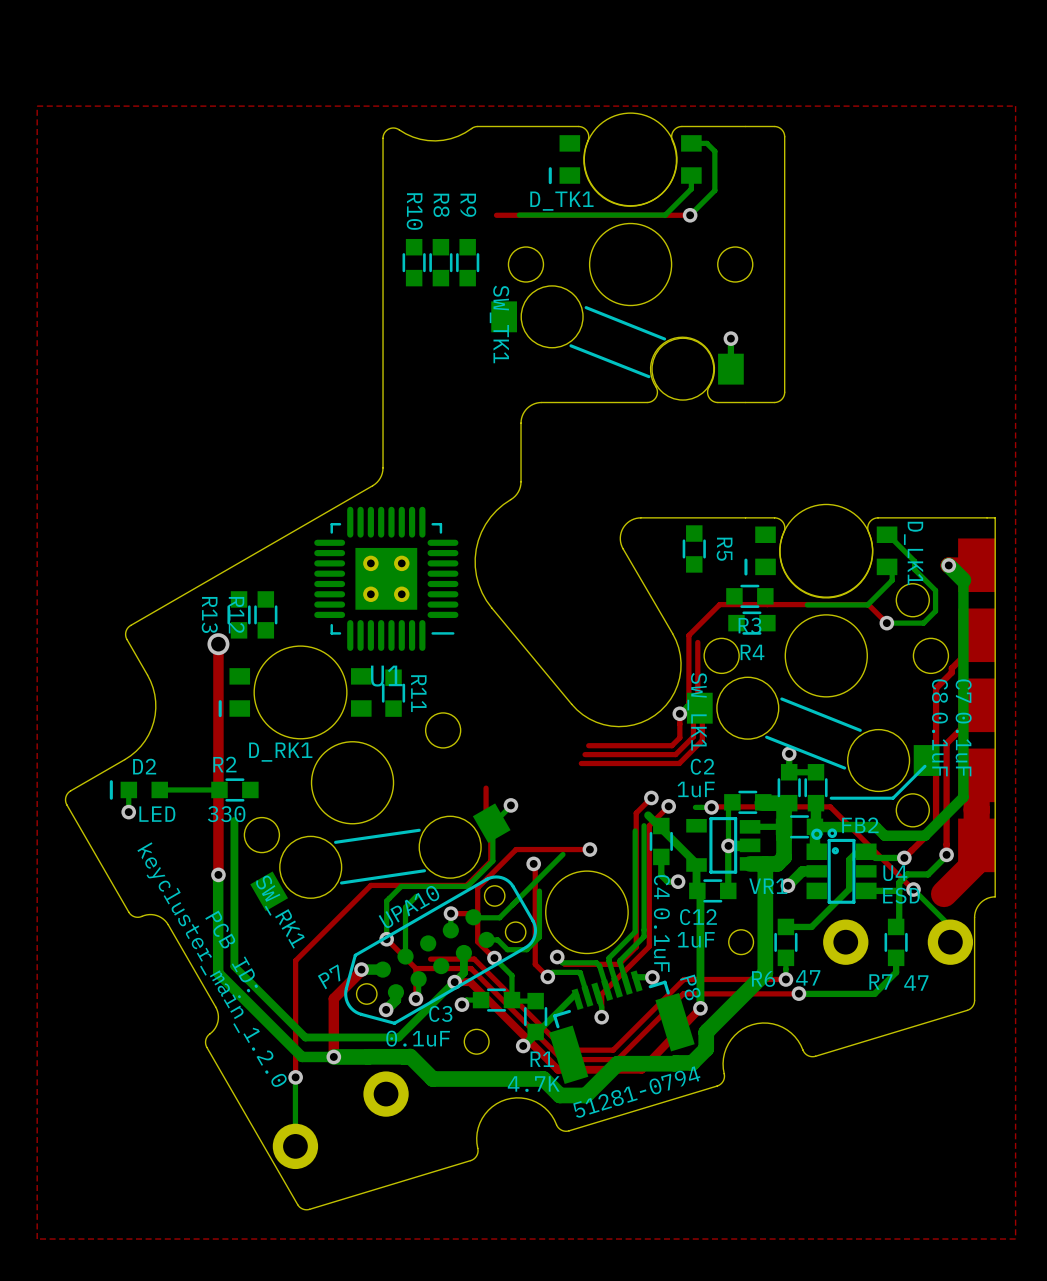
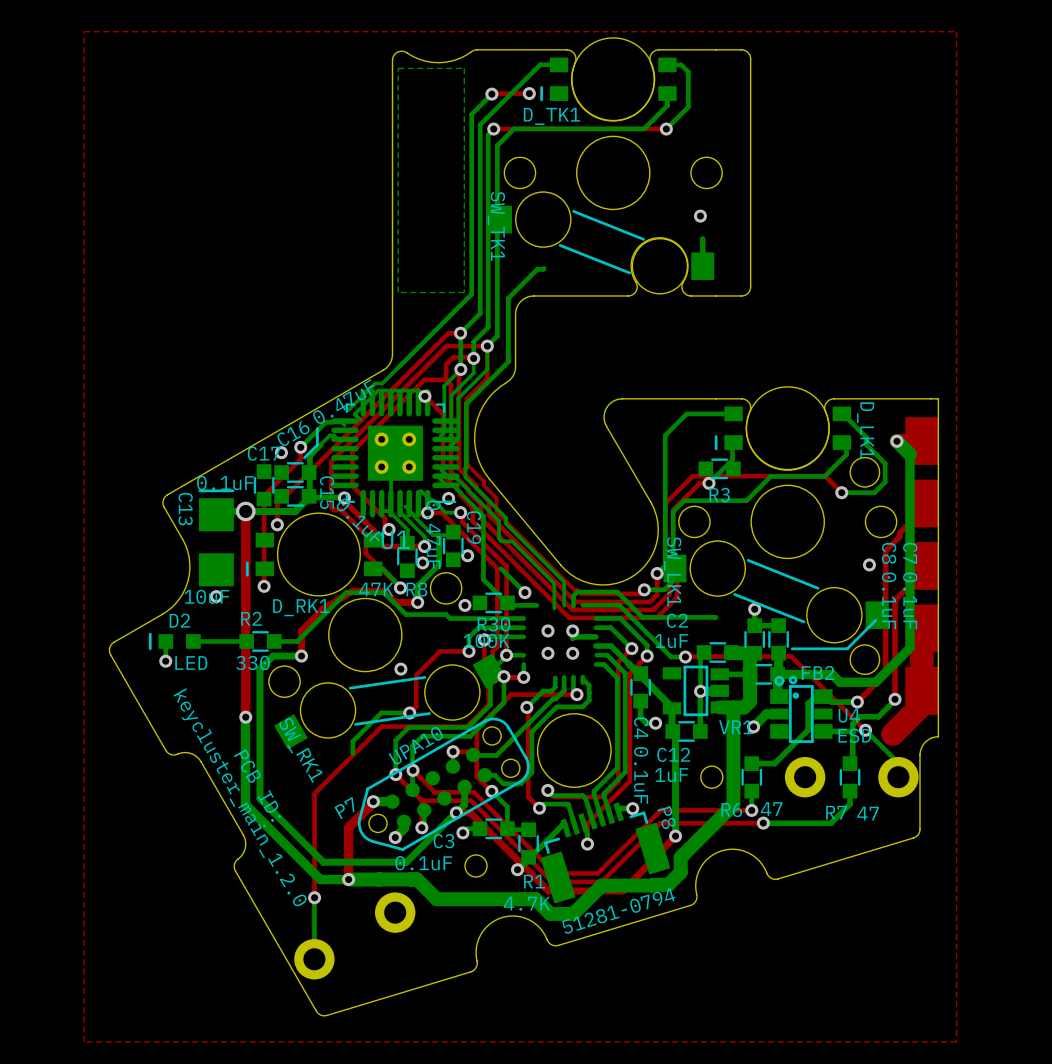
bottom track: none -> (559, 64) (540, 64) (480, 124) (480, 313) (460, 333)
bottom zone outline: none -> (464, 68) (398, 68) (398, 292) (464, 292) (464, 68)
top track: none -> (529, 93) (491, 94)
via: none -> (529, 93)
bottom track: none -> (491, 94) (471, 114) (471, 294) (382, 383) (375, 383) (348, 410)
via: none -> (491, 94)
R8 name rotation: 0° (441, 205) -> 90° counterclockwise (416, 589)
R8 name position: R8 (441, 205) -> R8 (416, 589)
bottom track: none -> (493, 129) (488, 134) (488, 327) (473, 341) (473, 373) (451, 395) (451, 435) (446, 440)
via: none -> (493, 129)
bottom track: none -> (514, 128) (497, 145) (497, 336) (487, 346)
R10: (414, 262) -> none
R8 position: (440, 262) -> (407, 556)
R9: (467, 262) -> none
via position: (730, 338) -> (700, 216)
bottom track: none -> (544, 268) (537, 269) (508, 298) (508, 361) (466, 403) (465, 477) (506, 517) (506, 523)
bottom track: none -> (460, 333) (460, 369) (444, 385) (444, 432) (440, 435)
top track: none -> (460, 333) (448, 333) (277, 504) (277, 524)
via: none -> (460, 333)
bottom track: none -> (487, 345) (487, 369) (458, 398) (458, 438) (449, 447)
via: none -> (487, 346)
top track: none -> (473, 358) (453, 357) (446, 364) (446, 379)
via: none -> (473, 358)
via: none -> (460, 369)
top track: none -> (460, 369) (458, 371) (458, 468) (489, 501) (489, 515) (575, 601)
top track: none -> (446, 379) (424, 379) (352, 451) (352, 485) (385, 518) (385, 527) (387, 529)
top track: none -> (446, 379) (451, 384) (451, 471) (481, 504) (481, 518) (572, 609)
top track: none -> (422, 393) (443, 414) (443, 475) (472, 507) (472, 521) (569, 617)
bottom track: none -> (425, 396) (419, 390) (378, 390) (355, 413) (360, 419)
via: none -> (424, 396)
bottom track: none -> (728, 413) (686, 413) (665, 435) (665, 565)
bottom track: none -> (344, 425) (341, 422) (325, 422) (300, 447)
R5: (694, 548) -> none
line: none -> (317, 428) (317, 444) (304, 457)
bottom track: none -> (336, 438) (334, 435) (329, 435) (320, 444)
bottom track: none -> (320, 445) (309, 455) (309, 492)
bottom track: none -> (732, 444) (732, 459) (709, 483)
top track: none -> (300, 447) (300, 459) (264, 495) (264, 586)
via: none -> (300, 447)
via: none -> (281, 452)
bottom track: none -> (441, 470) (449, 478) (456, 478) (499, 520) (499, 538) (501, 540)
C16: none -> 0.47uF (295, 472)
bottom track: none -> (436, 475) (446, 485) (453, 485) (475, 507)
bottom track: none -> (770, 476) (746, 500) (684, 500) (673, 511) (673, 580) (664, 589) (643, 589)
bottom track: none -> (391, 477) (391, 492)
R13 value: none -> 0.1uF (225, 483)
top track: none -> (709, 483) (699, 483) (673, 509)
via: none -> (709, 483)
R13 name: R13 (209, 614) -> C17 (264, 453)
R12: (265, 614) -> none
bottom track: none -> (420, 490) (445, 512) (460, 512)
bottom track: none -> (309, 492) (313, 497) (345, 497)
bottom track: none -> (309, 492) (309, 497) (295, 511) (219, 511) (216, 514)
R4: (751, 623) -> none
C15: none -> 0.1uF (295, 496)
via: none -> (344, 497)
top track: none -> (345, 497) (345, 502) (374, 531) (374, 537) (383, 546) (424, 546)
via: none -> (448, 498)
bottom track: none -> (405, 506) (432, 535) (453, 535) (458, 530)
bottom track: none -> (475, 508) (483, 516) (483, 579) (509, 605) (536, 605)
bottom track: none -> (385, 511) (389, 511) (407, 529) (407, 539)
bottom track: none -> (400, 511) (424, 536) (424, 546)
top track: none -> (427, 512) (441, 512) (497, 568) (497, 646) (492, 651) (492, 665) (504, 677) (523, 677)
via: none -> (427, 512)
via: none -> (460, 512)
top track: none -> (462, 513) (462, 522) (506, 566) (506, 655)
bottom track: none -> (506, 524) (564, 581) (564, 605)
via: none -> (277, 524)
via: none -> (389, 529)
bottom track: none -> (439, 535) (439, 564) (417, 586) (417, 602)
C13: none -> 10uF (216, 537)
bottom track: none -> (501, 541) (512, 541) (554, 583) (554, 608)
C19: none -> 0.47uF (453, 545)
via: none -> (424, 546)
R11: (393, 693) -> none
via: none -> (467, 555)
via: none -> (422, 562)
via: none -> (869, 564)
bottom track: none -> (377, 568) (382, 568) (400, 587)
bottom track: none -> (501, 568) (524, 592)
via: none -> (264, 586)
top track: none -> (400, 587) (365, 553) (365, 534) (341, 510) (334, 510) (331, 507) (331, 461) (446, 346) (487, 346) (487, 378) (466, 399) (466, 464) (484, 481) (484, 485) (496, 498) (496, 512) (574, 590) (581, 593) (640, 593) (643, 590)
via: none -> (400, 587)
R8 value: none -> 47K (376, 589)
via: none -> (644, 589)
via: none -> (524, 592)
via: none -> (216, 596)
top track: none -> (417, 602) (395, 602) (384, 591) (352, 591) (323, 608) (301, 630) (301, 656)
via: none -> (417, 602)
R30: none -> 100K (493, 602)
via: none -> (464, 605)
bottom track: none -> (582, 605) (619, 605) (671, 657)
bottom track: none -> (573, 606) (573, 595) (577, 592) (617, 592) (642, 617) (715, 617)
bottom track: none -> (523, 618) (450, 618) (446, 614) (406, 614) (384, 592) (346, 592) (297, 641) (274, 641)
bottom track: none -> (595, 618) (620, 618) (647, 645) (647, 656)
bottom track: none -> (523, 627) (478, 627) (468, 637) (468, 651)
bottom track: none -> (595, 627) (610, 627) (631, 648)
via: none -> (547, 630)
via: none -> (572, 630)
bottom track: none -> (523, 636) (487, 636) (484, 639)
bottom track: none -> (595, 636) (572, 638)
via: none -> (484, 639)
bottom track: none -> (595, 646) (611, 646) (628, 663)
via: none -> (468, 651)
top track: none -> (471, 651) (440, 651) (416, 675) (416, 706) (409, 712)
via: none -> (547, 653)
via: none -> (572, 653)
bottom track: none -> (523, 655) (506, 655)
bottom track: none -> (596, 655) (607, 655) (625, 673)
bottom track: none -> (301, 656) (273, 656) (259, 669)
via: none -> (301, 656)
bottom track: none -> (523, 664) (523, 677)
bottom track: none -> (595, 664) (603, 664) (617, 678)
via: none -> (400, 669)
bottom track: none -> (503, 676) (503, 702) (470, 736) (422, 736)
via: none -> (503, 676)
bottom track: none -> (573, 677) (573, 691) (576, 694)
bottom track: none -> (582, 677) (582, 682)
via: none -> (523, 677)
bottom track: none -> (555, 678) (555, 687) (551, 691) (543, 691) (526, 707)
bottom track: none -> (564, 677) (564, 690) (555, 698) (552, 698)
bottom track: none -> (583, 680) (589, 685) (589, 700) (582, 706) (556, 706) (531, 731)
bottom track: none -> (409, 712) (381, 712) (352, 741) (352, 753)
via: none -> (409, 712)
top track: none -> (413, 770) (434, 792)
via: none -> (413, 770)

